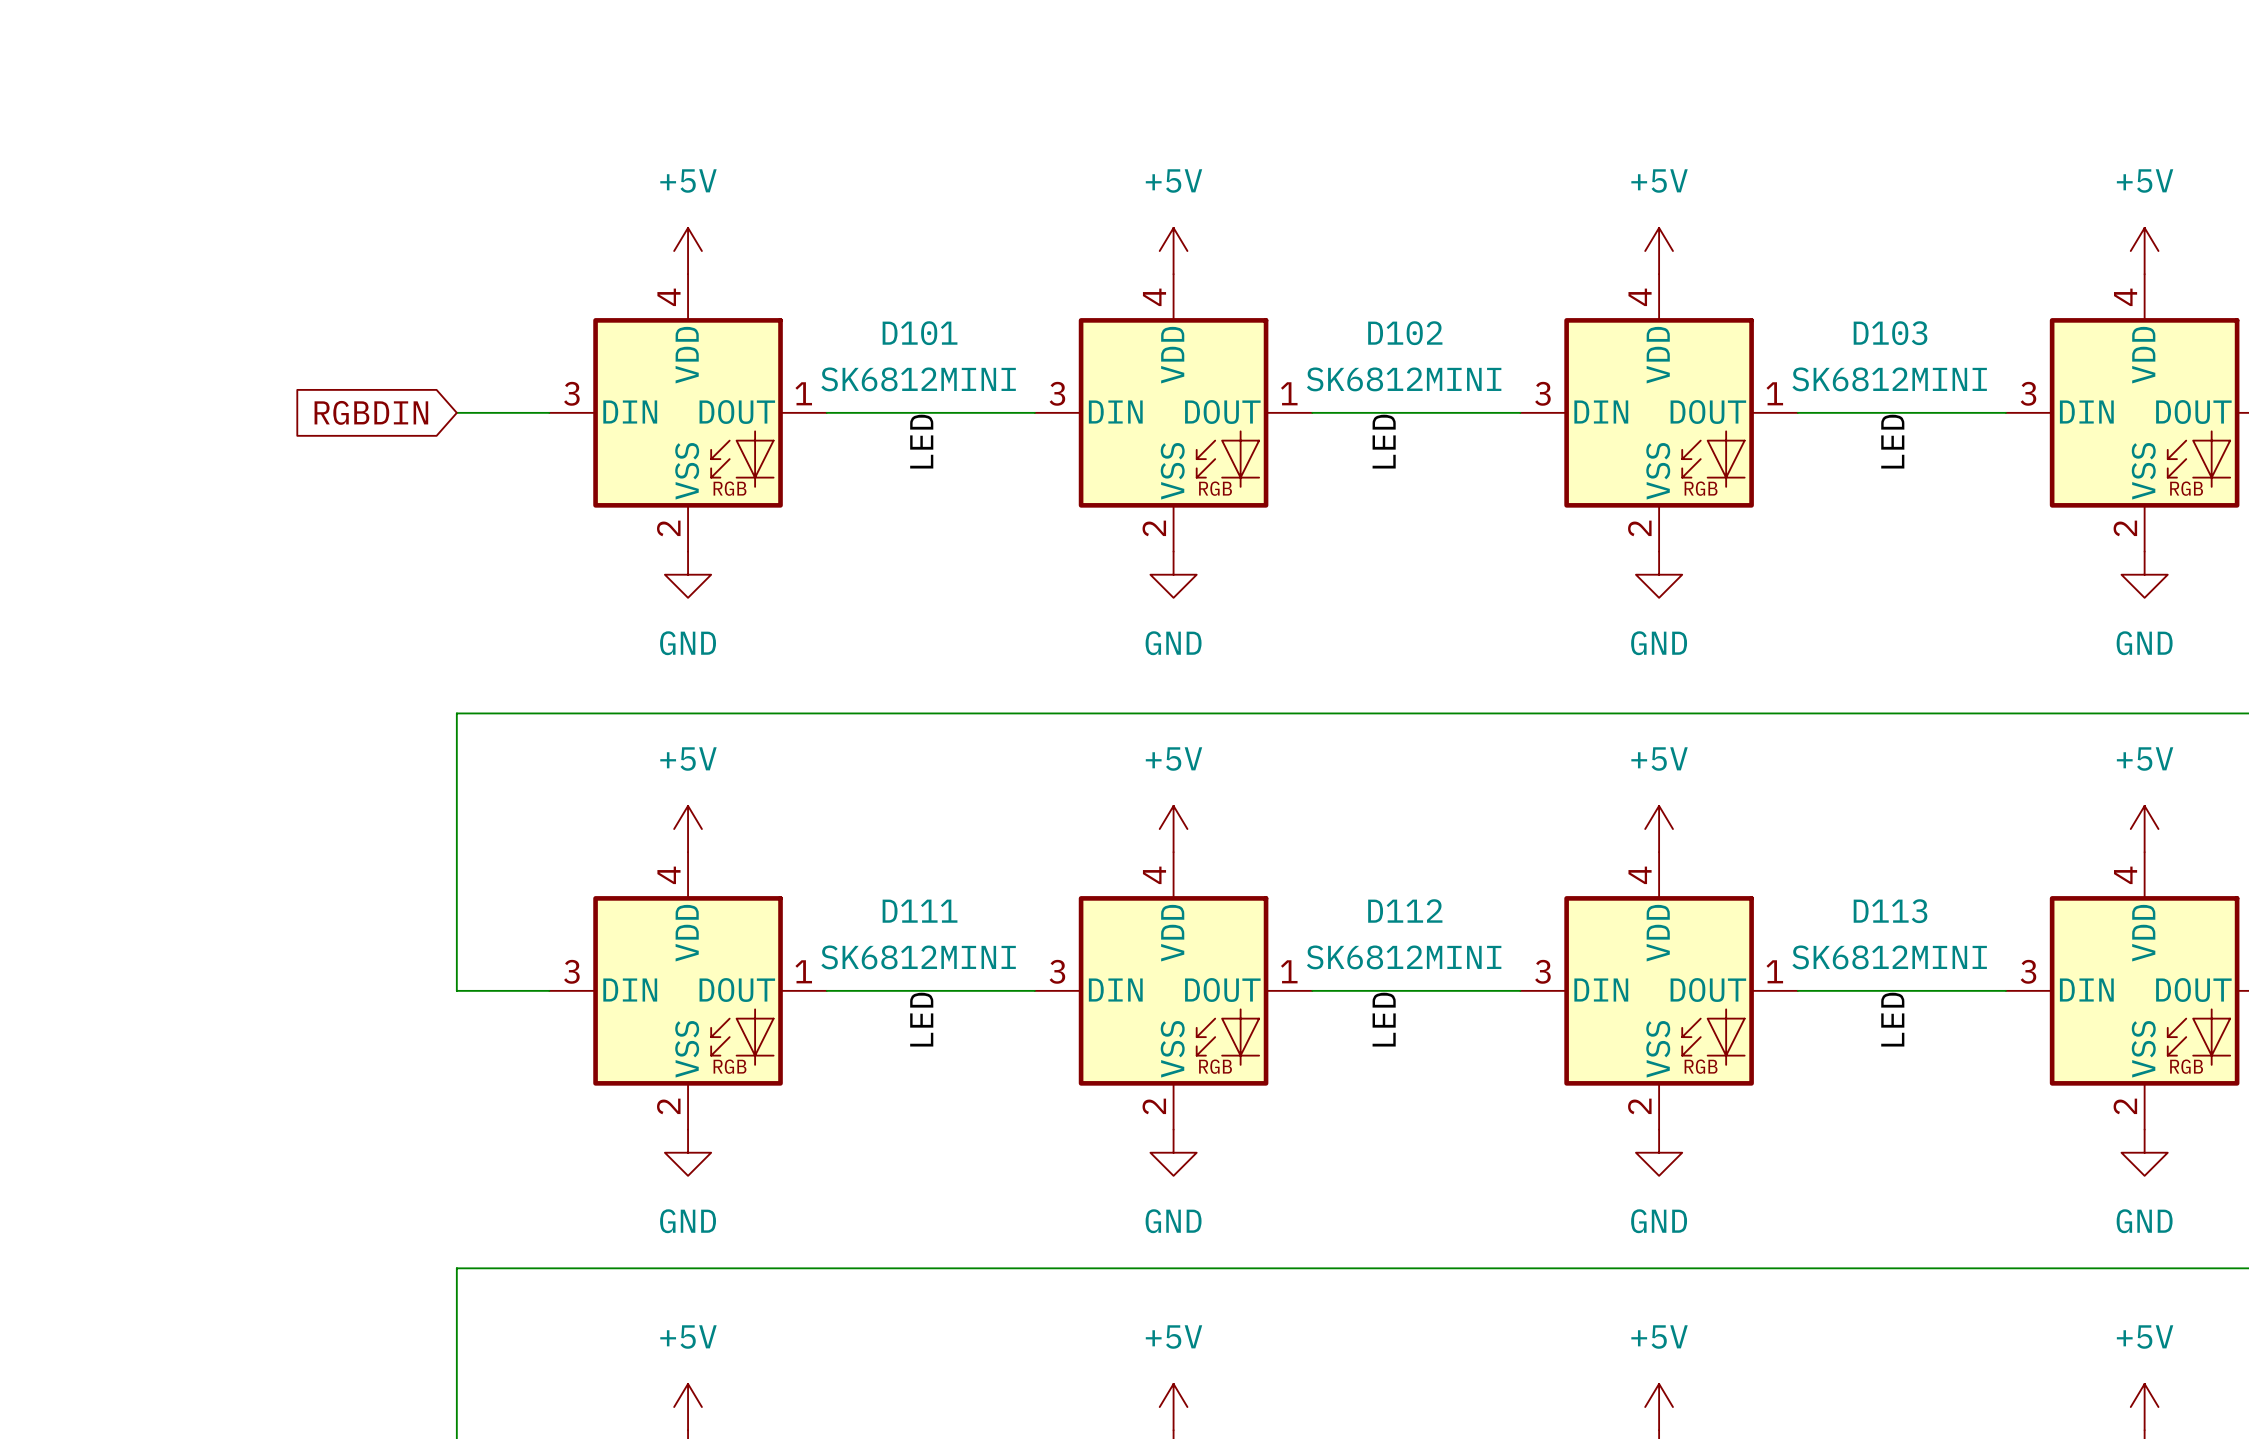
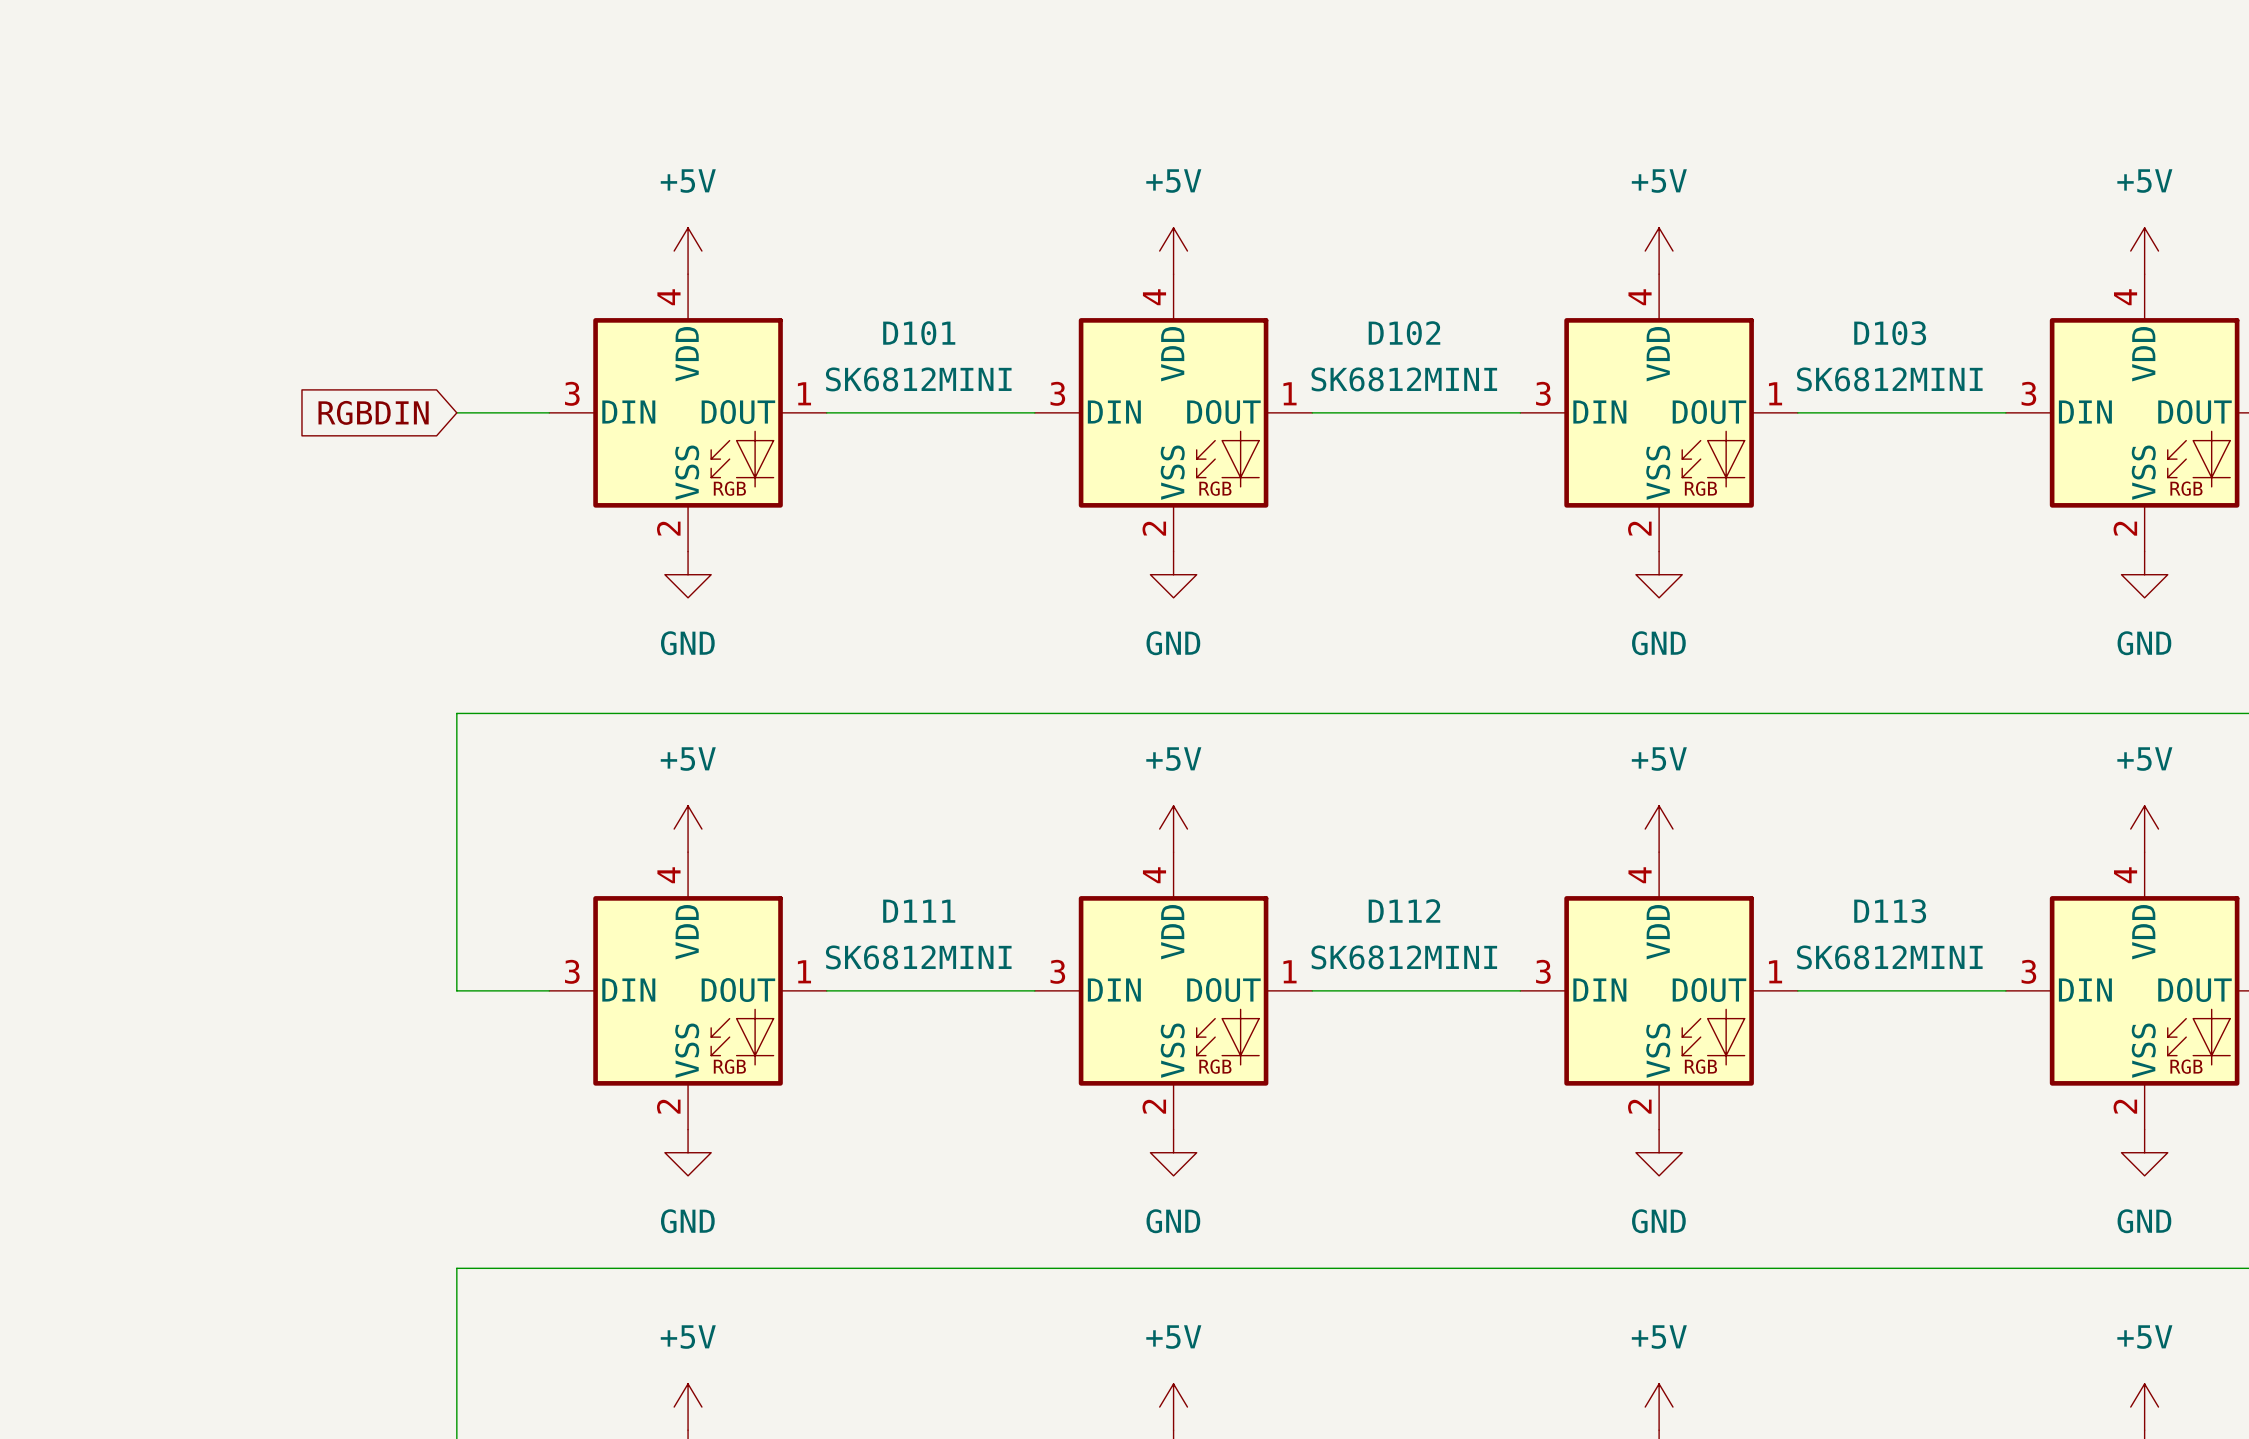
label: LED (921, 441) -> none
label: LED (1384, 441) -> none
label: LED (1892, 441) -> none
label: LED (921, 1019) -> none
label: LED (1384, 1019) -> none
label: LED (1892, 1019) -> none

